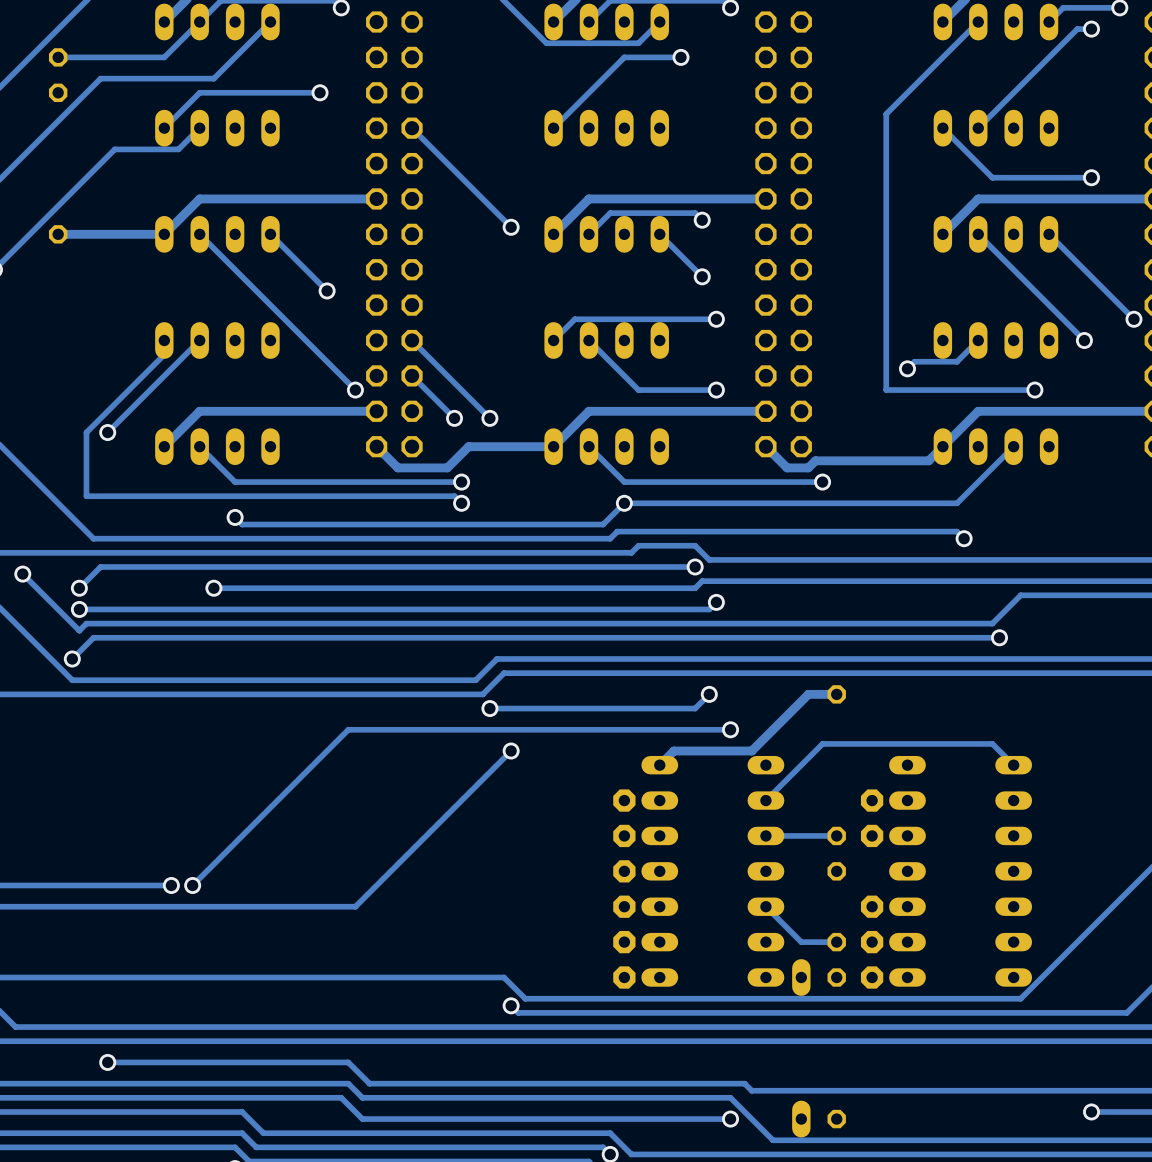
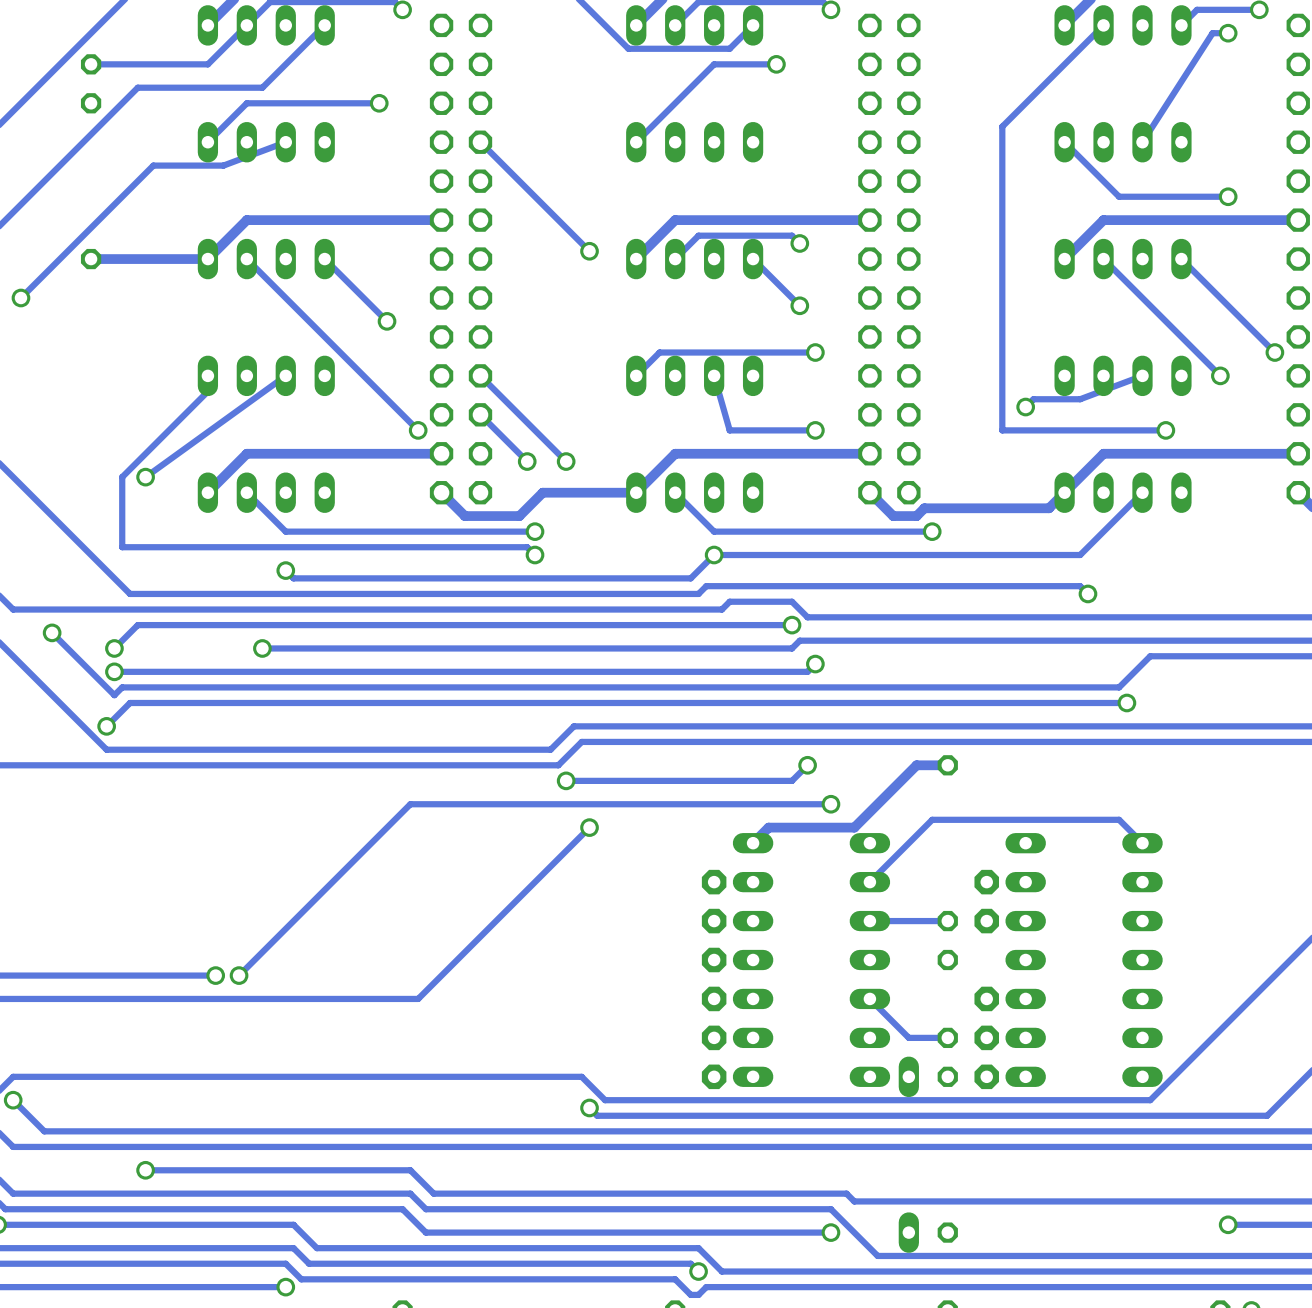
track: (1077, 29) (978, 128) -> (1212, 33) (1142, 142)
track: (199, 128) (178, 149) -> (285, 142) (223, 165)
track: (199, 340) (107, 432) -> (285, 375) (145, 477)
track: (588, 340) (638, 390) -> (714, 375) (729, 430)
track: (978, 340) (957, 361) -> (1142, 375) (1080, 399)

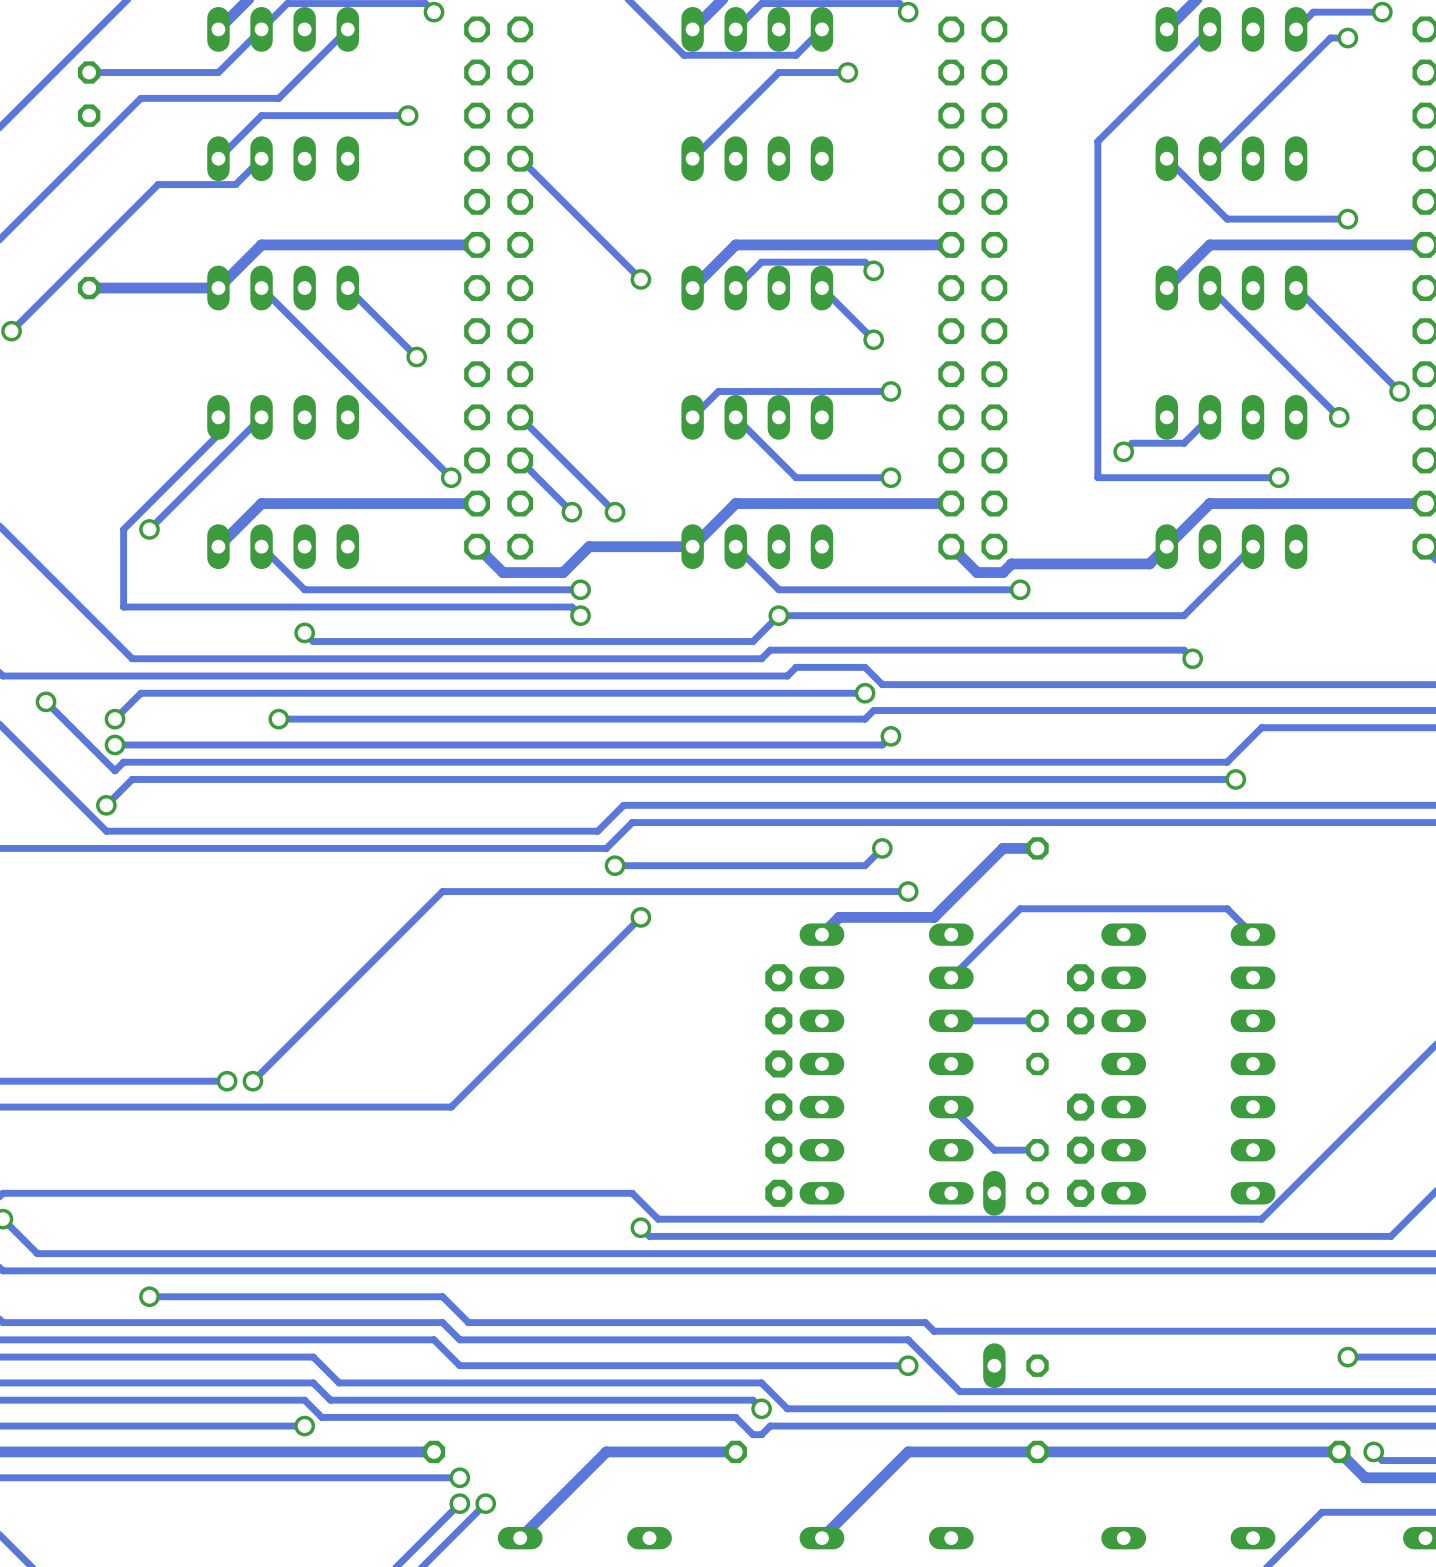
track: (1212, 33) (1142, 142) -> (1330, 38) (1209, 158)
track: (285, 142) (223, 165) -> (261, 158) (235, 184)
track: (285, 375) (145, 477) -> (261, 417) (149, 529)
track: (714, 375) (729, 430) -> (735, 417) (796, 477)
track: (1142, 375) (1080, 399) -> (1209, 417) (1184, 443)

